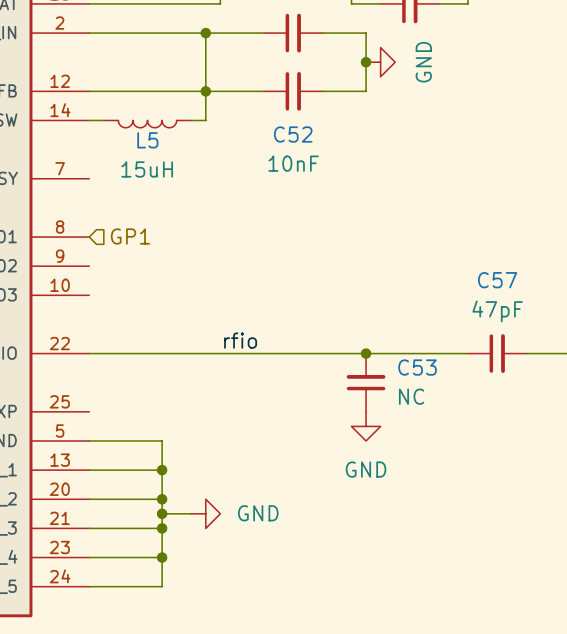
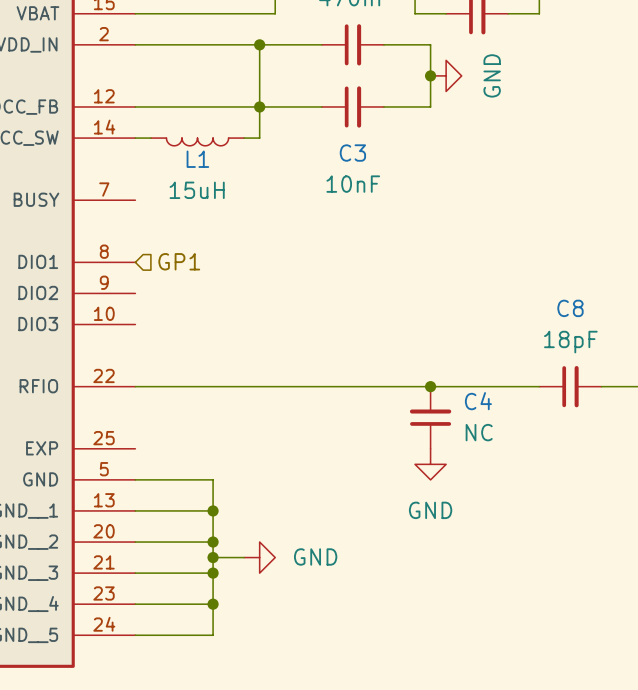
C52 name: C52 (293, 134) -> C3 (352, 153)
L5 name: L5 (147, 140) -> L1 (197, 159)
C57 name: C57 (497, 280) -> C8 (570, 308)
C57 value: 47pF (497, 311) -> 18pF (570, 342)
label: rfio (240, 340) -> none
C53 name: C53 (417, 367) -> C4 (478, 401)

